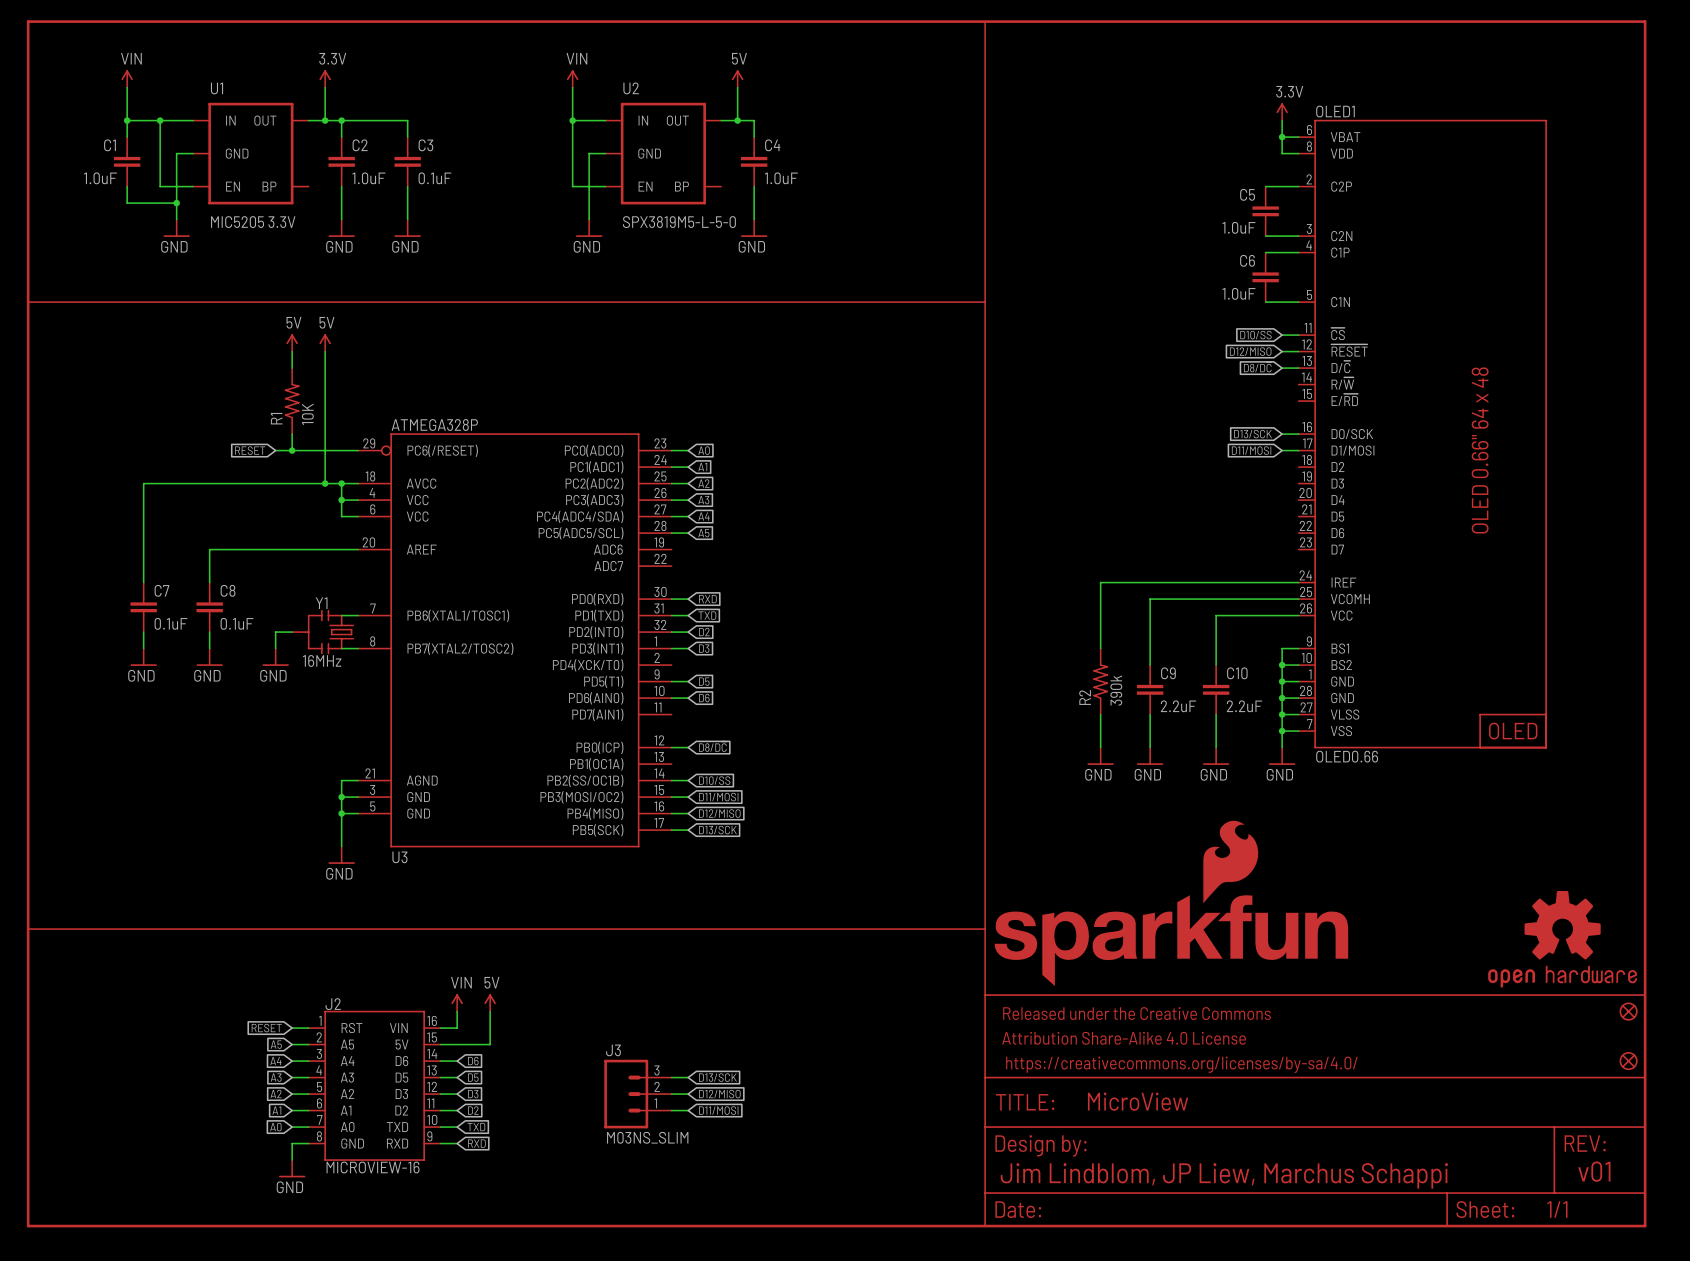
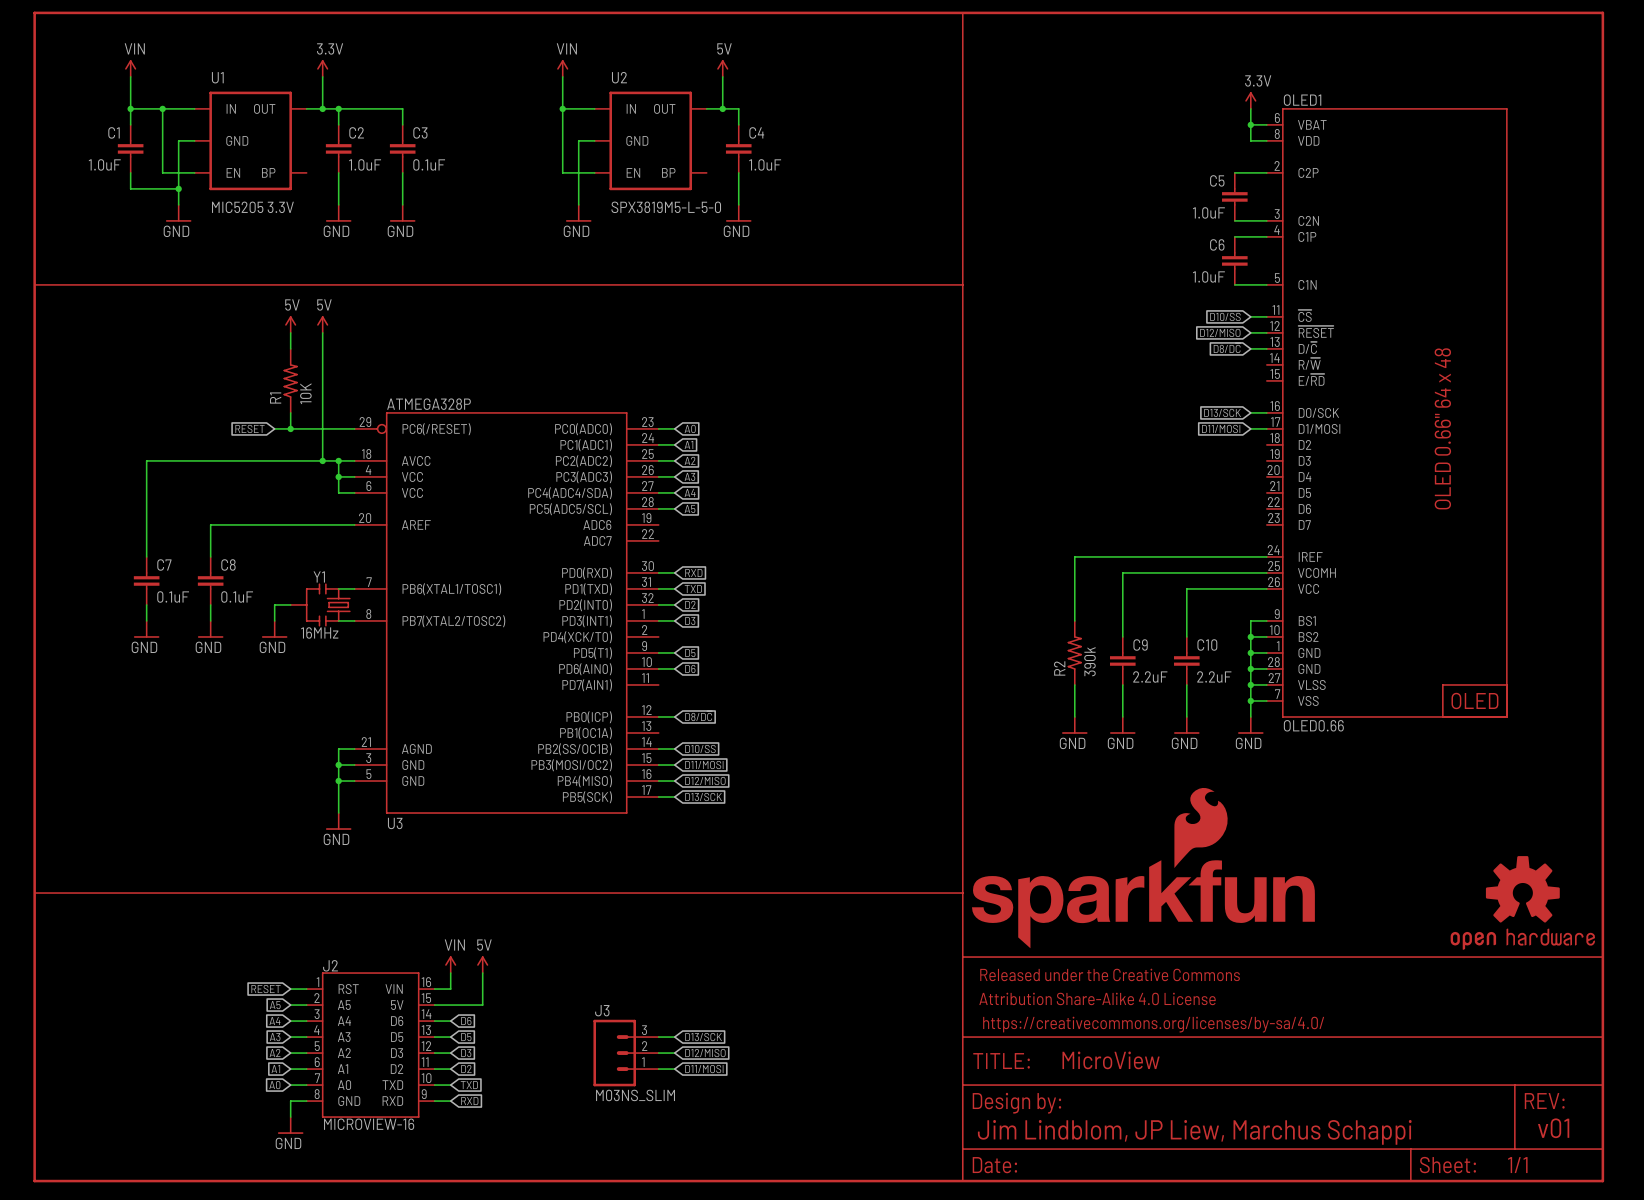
part: (1628, 1011) -> none
part: (1628, 1061) -> none

